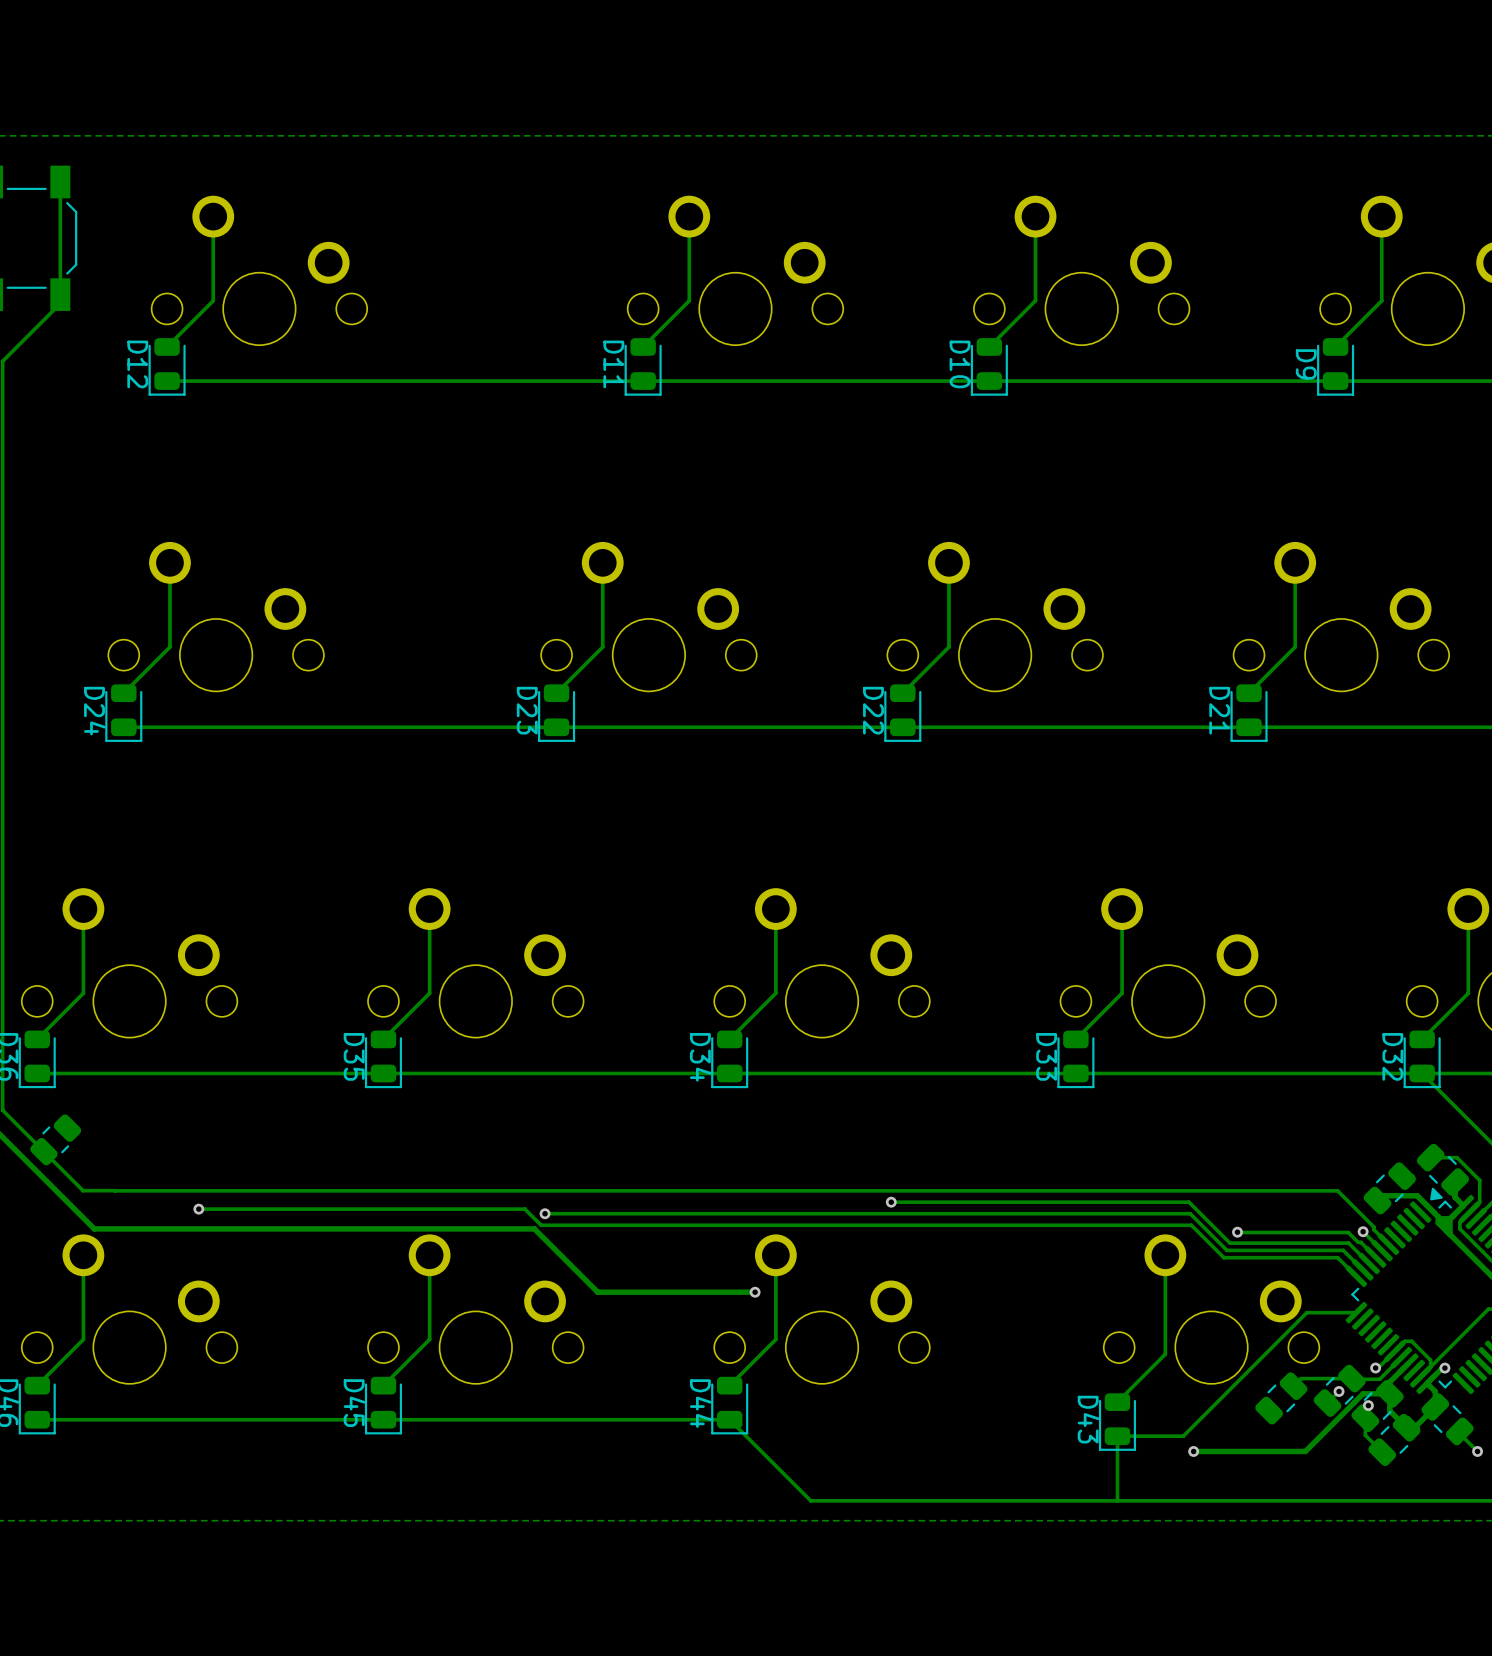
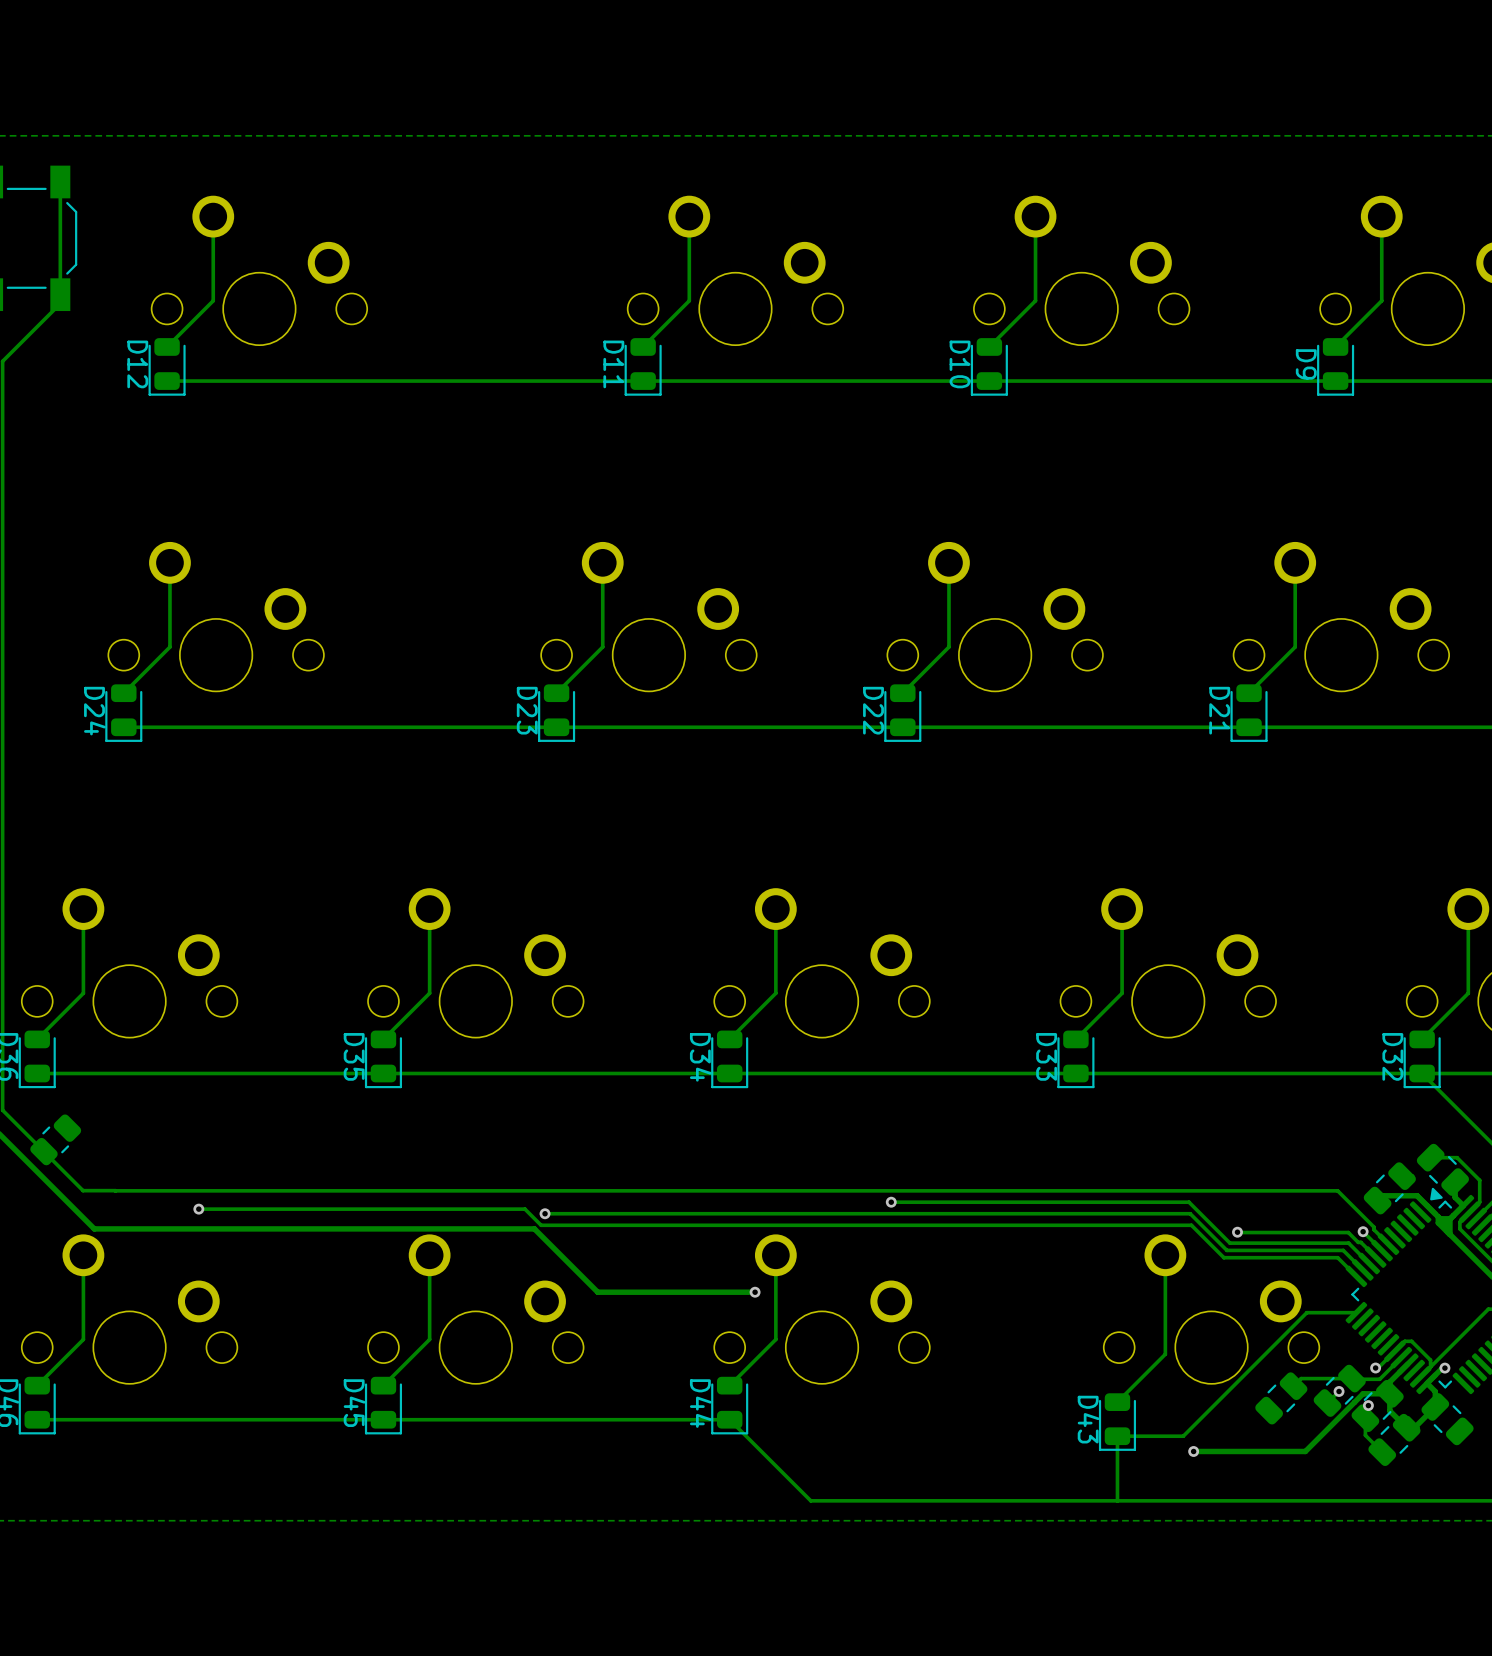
track: (1459, 1433) (1477, 1451) -> none
via: (1477, 1451) -> none

